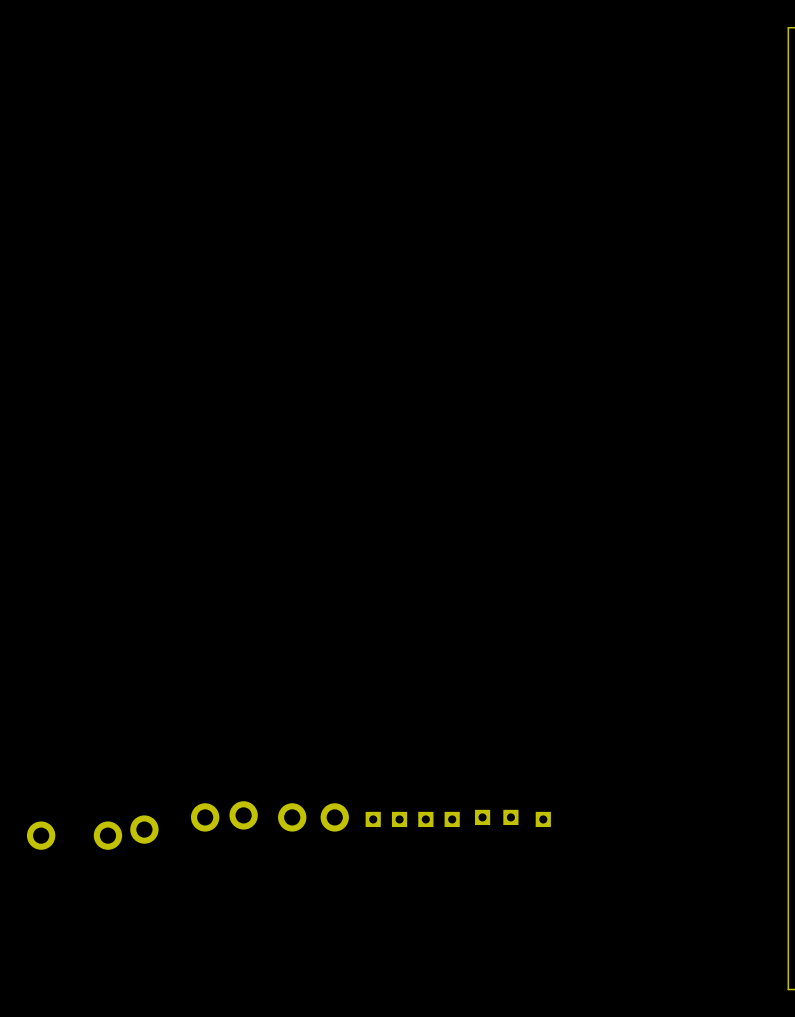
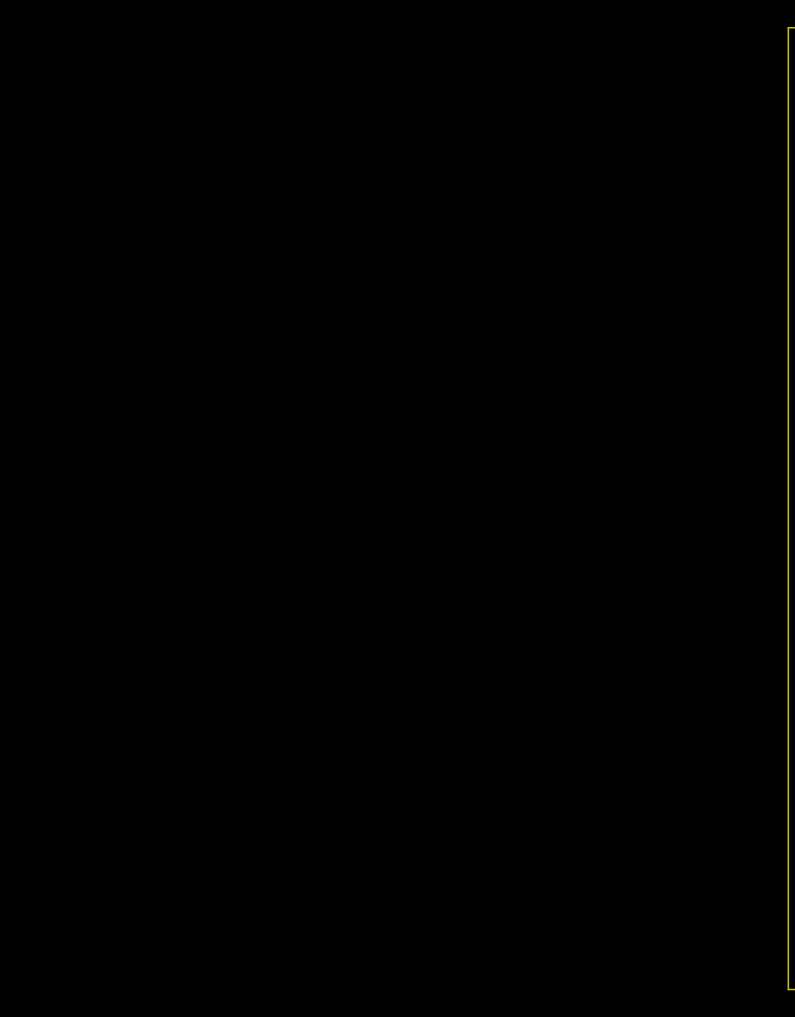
part: (243, 815) -> none
part: (205, 817) -> none
part: (292, 817) -> none
part: (334, 817) -> none
part: (482, 817) -> none
part: (510, 817) -> none
part: (373, 819) -> none
part: (399, 819) -> none
part: (425, 819) -> none
part: (452, 819) -> none
part: (543, 819) -> none
part: (144, 829) -> none
part: (41, 835) -> none
part: (107, 835) -> none

